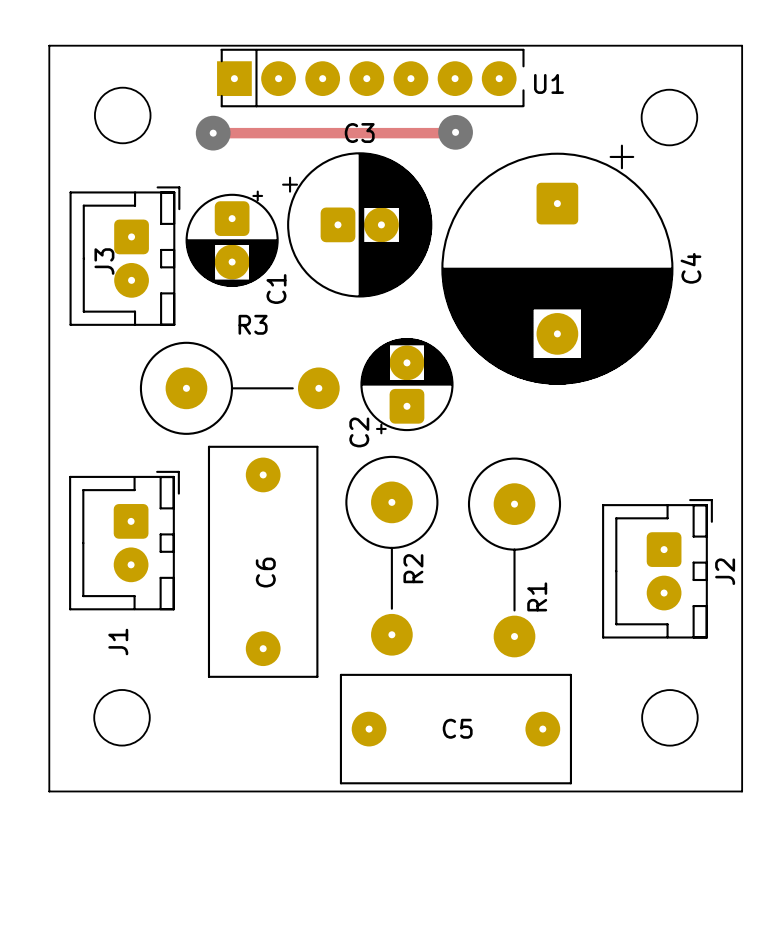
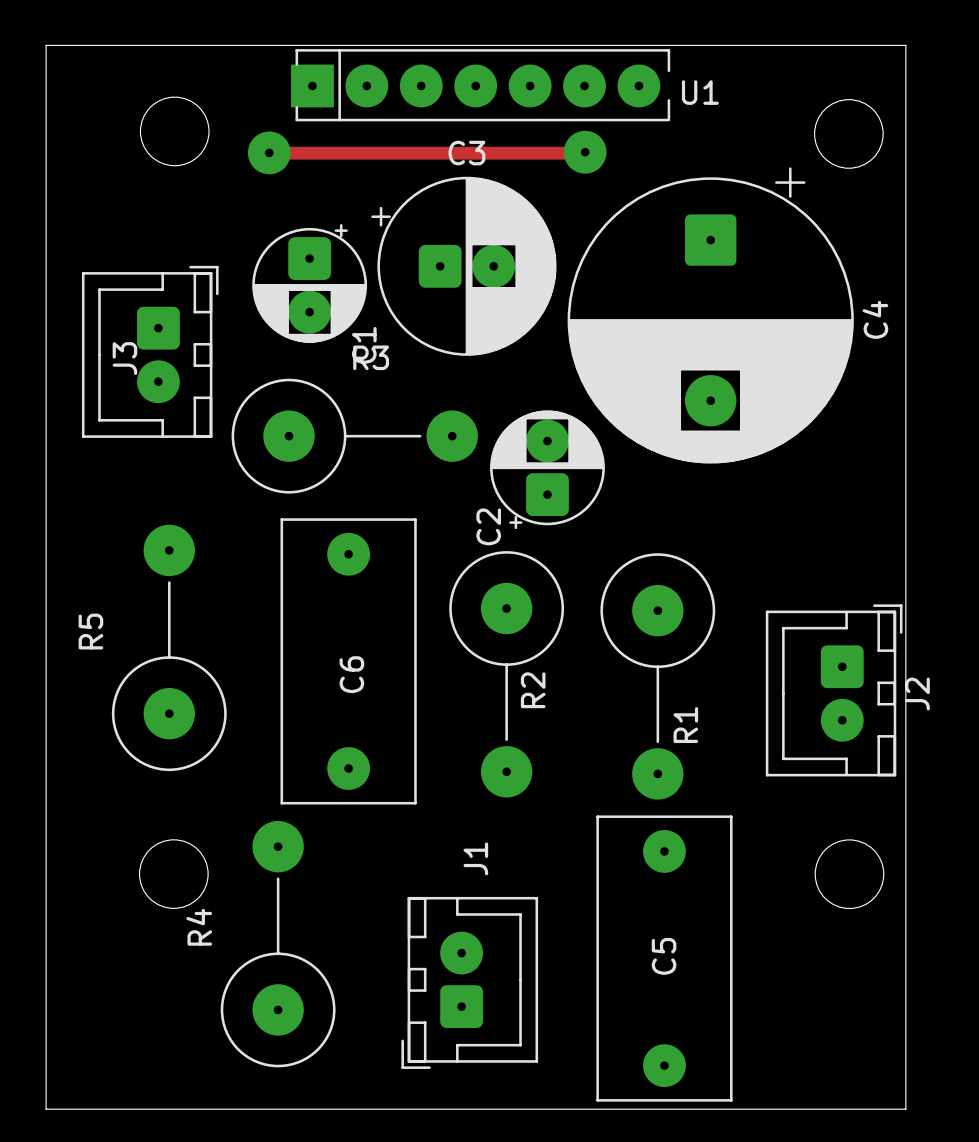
board edge: (49, 45) (49, 791) (742, 791) (742, 45) (715, 45) -> (84, 45) (46, 45) (46, 1109) (905, 1109) (905, 45)
via position: (213, 133) -> (269, 152)
J3 position: (124, 256) -> (150, 351)
C2 position: (406, 386) -> (547, 469)
R3 position: (239, 388) -> (354, 436)
R5: none -> (169, 647)
J1 rotation: 0° (124, 540) -> 180° (469, 982)
J1 position: (124, 540) -> (469, 982)
C6 position: (263, 561) -> (348, 661)
C5 rotation: 0° (455, 729) -> 90° clockwise (664, 958)
R4: none -> (278, 944)

